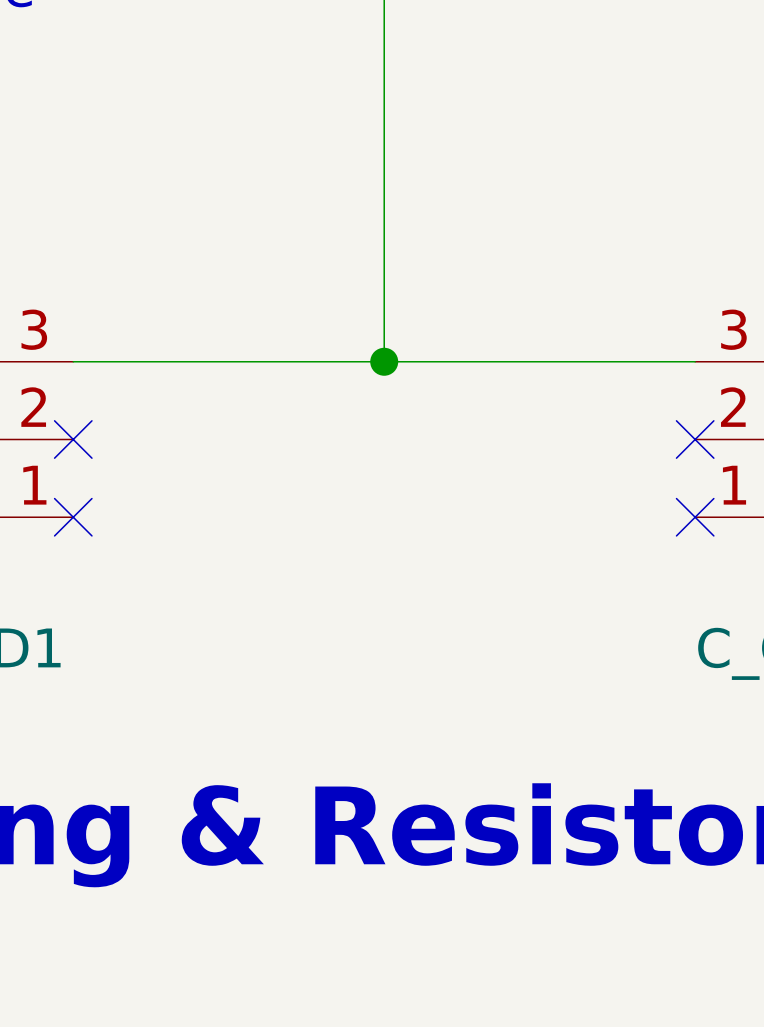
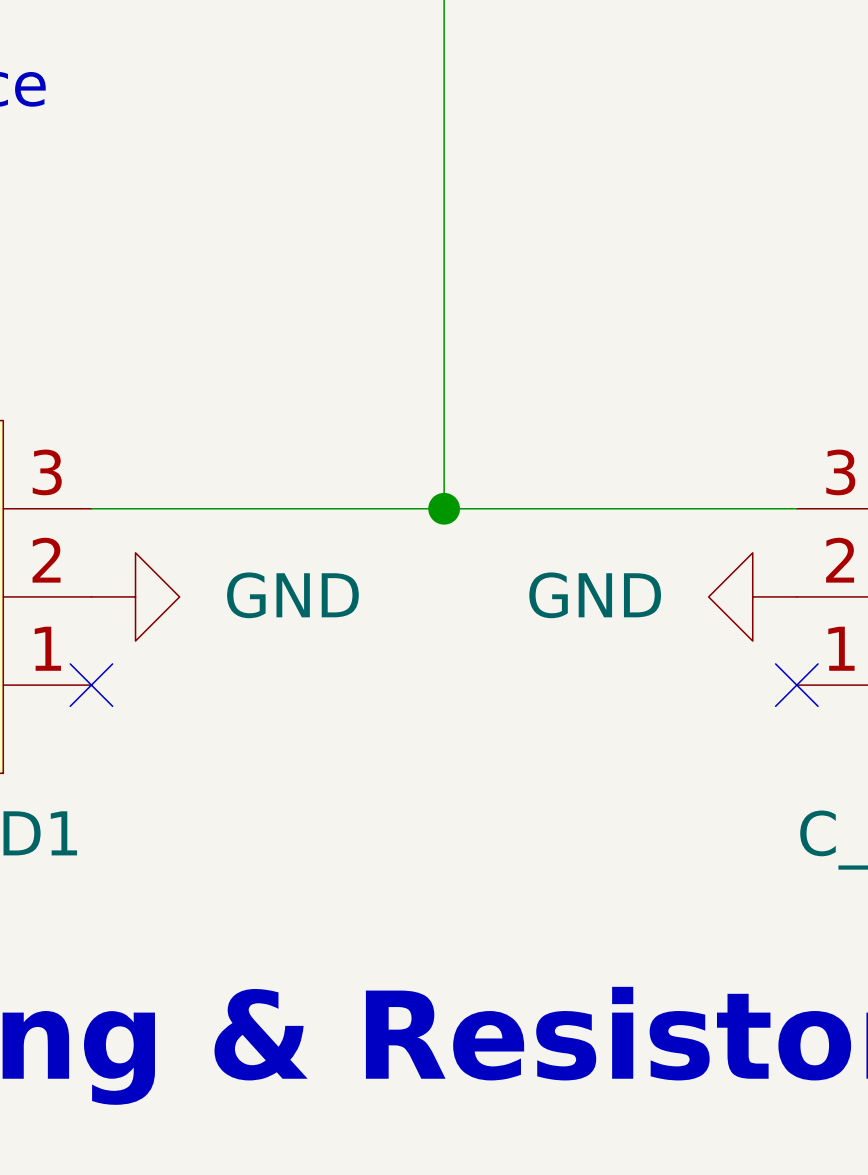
no-connect mark: (73, 439) -> none
power symbol: none -> GND (135, 596)
power symbol: none -> GND (752, 596)
no-connect mark: (695, 439) -> none

